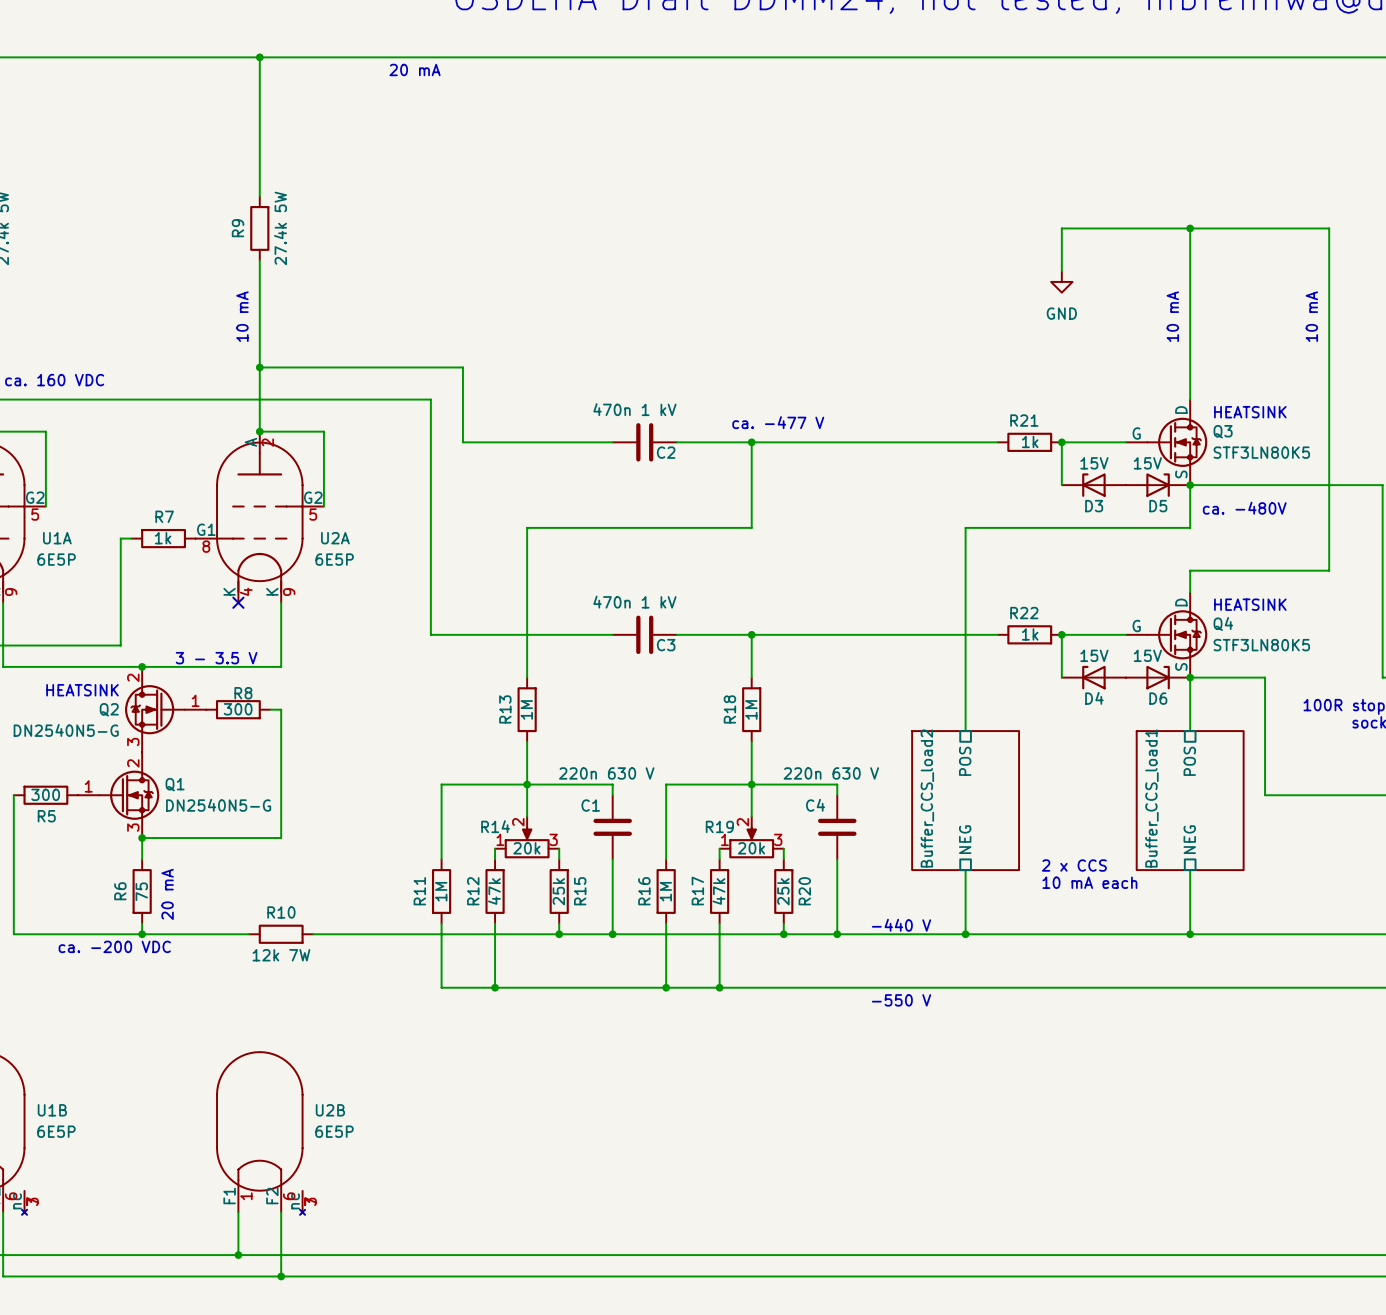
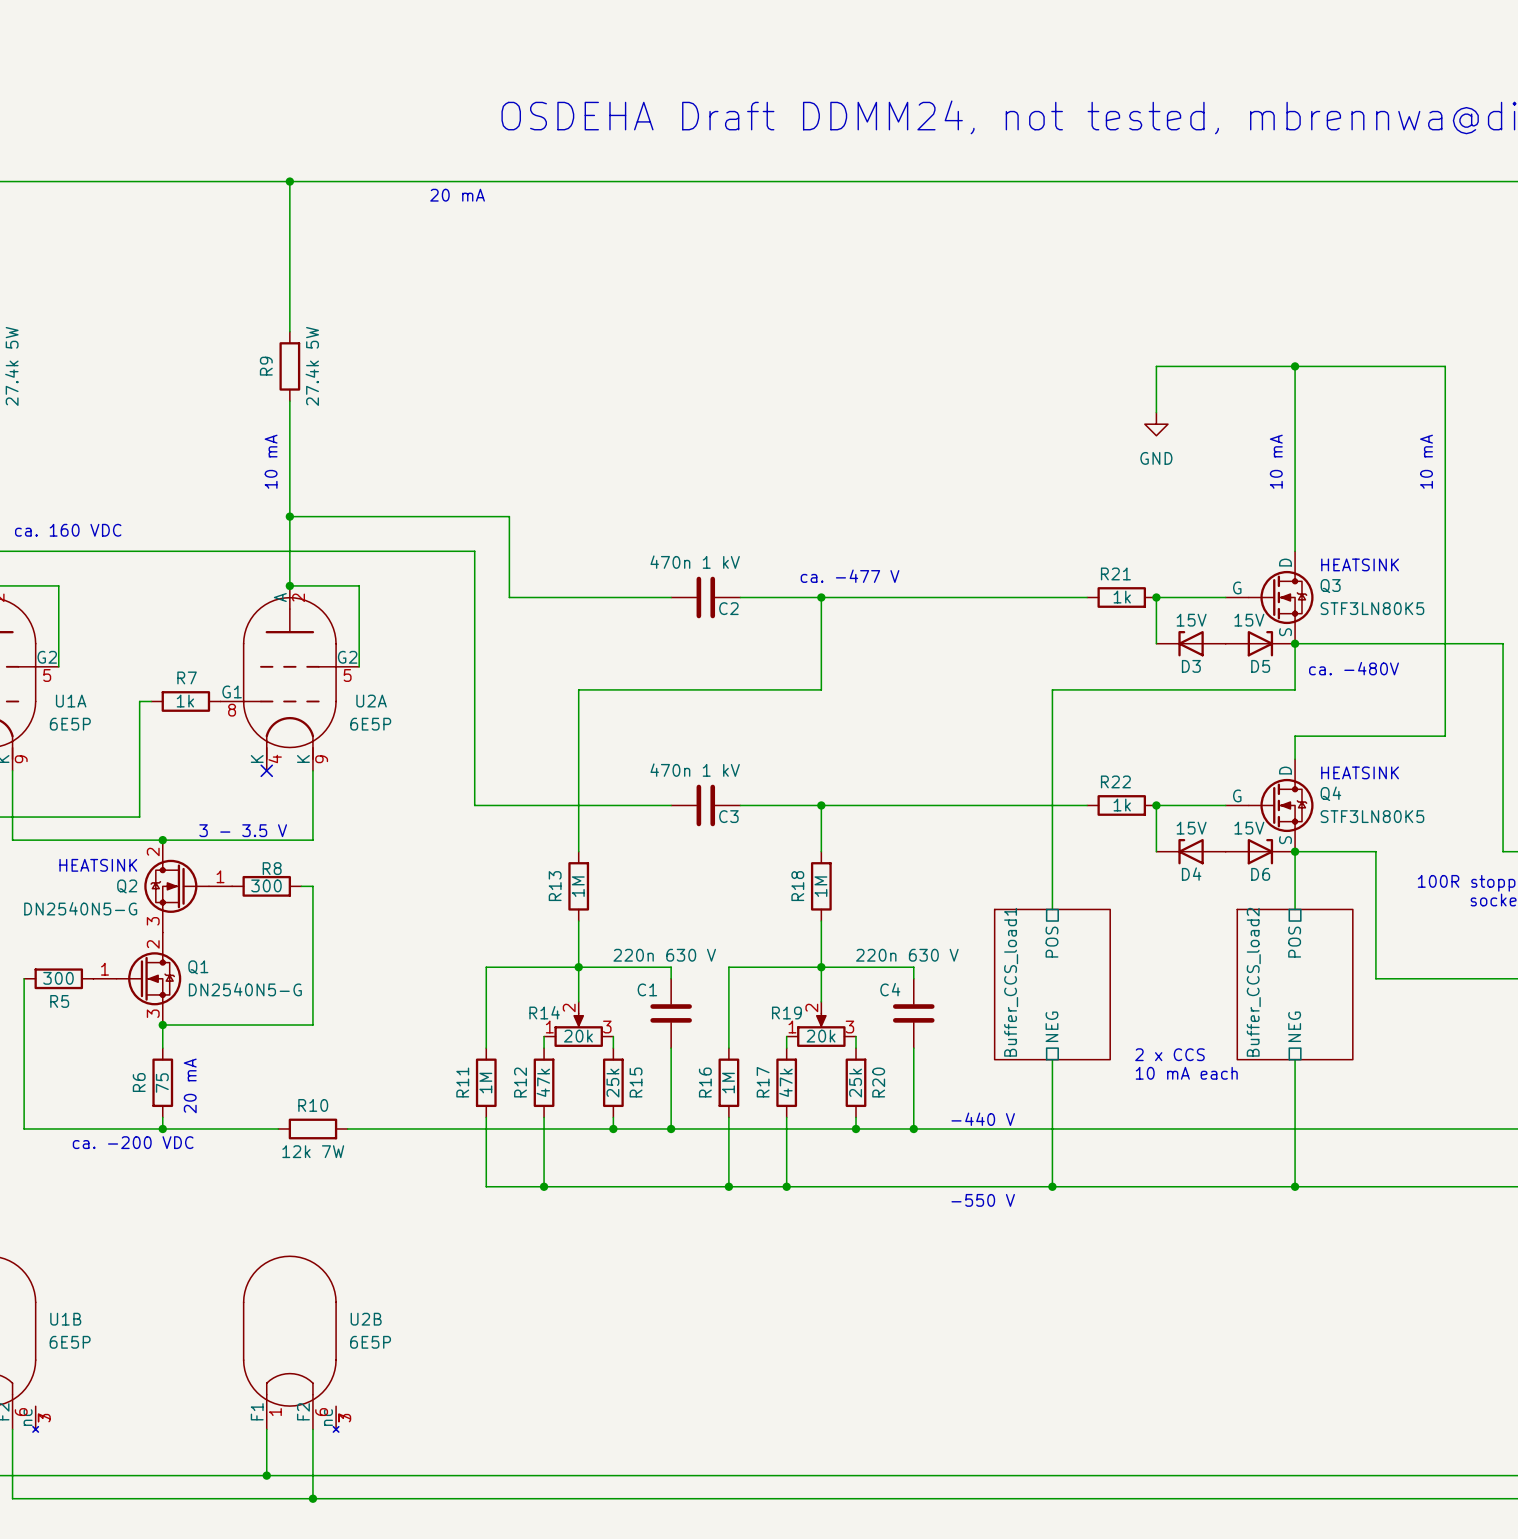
sheet Buffer_CCS_load2 name: Buffer_CCS_load2 (927, 798) -> Buffer_CCS_load1 (1011, 982)
sheet Buffer_CCS_load1 name: Buffer_CCS_load1 (1151, 798) -> Buffer_CCS_load2 (1253, 982)
wire: none -> (1052, 1128) (1052, 1186)
junction: (965, 934) -> none
wire: none -> (1295, 1128) (1295, 1186)
junction: (1190, 934) -> none
junction: none -> (1052, 1186)
junction: none -> (1295, 1186)

